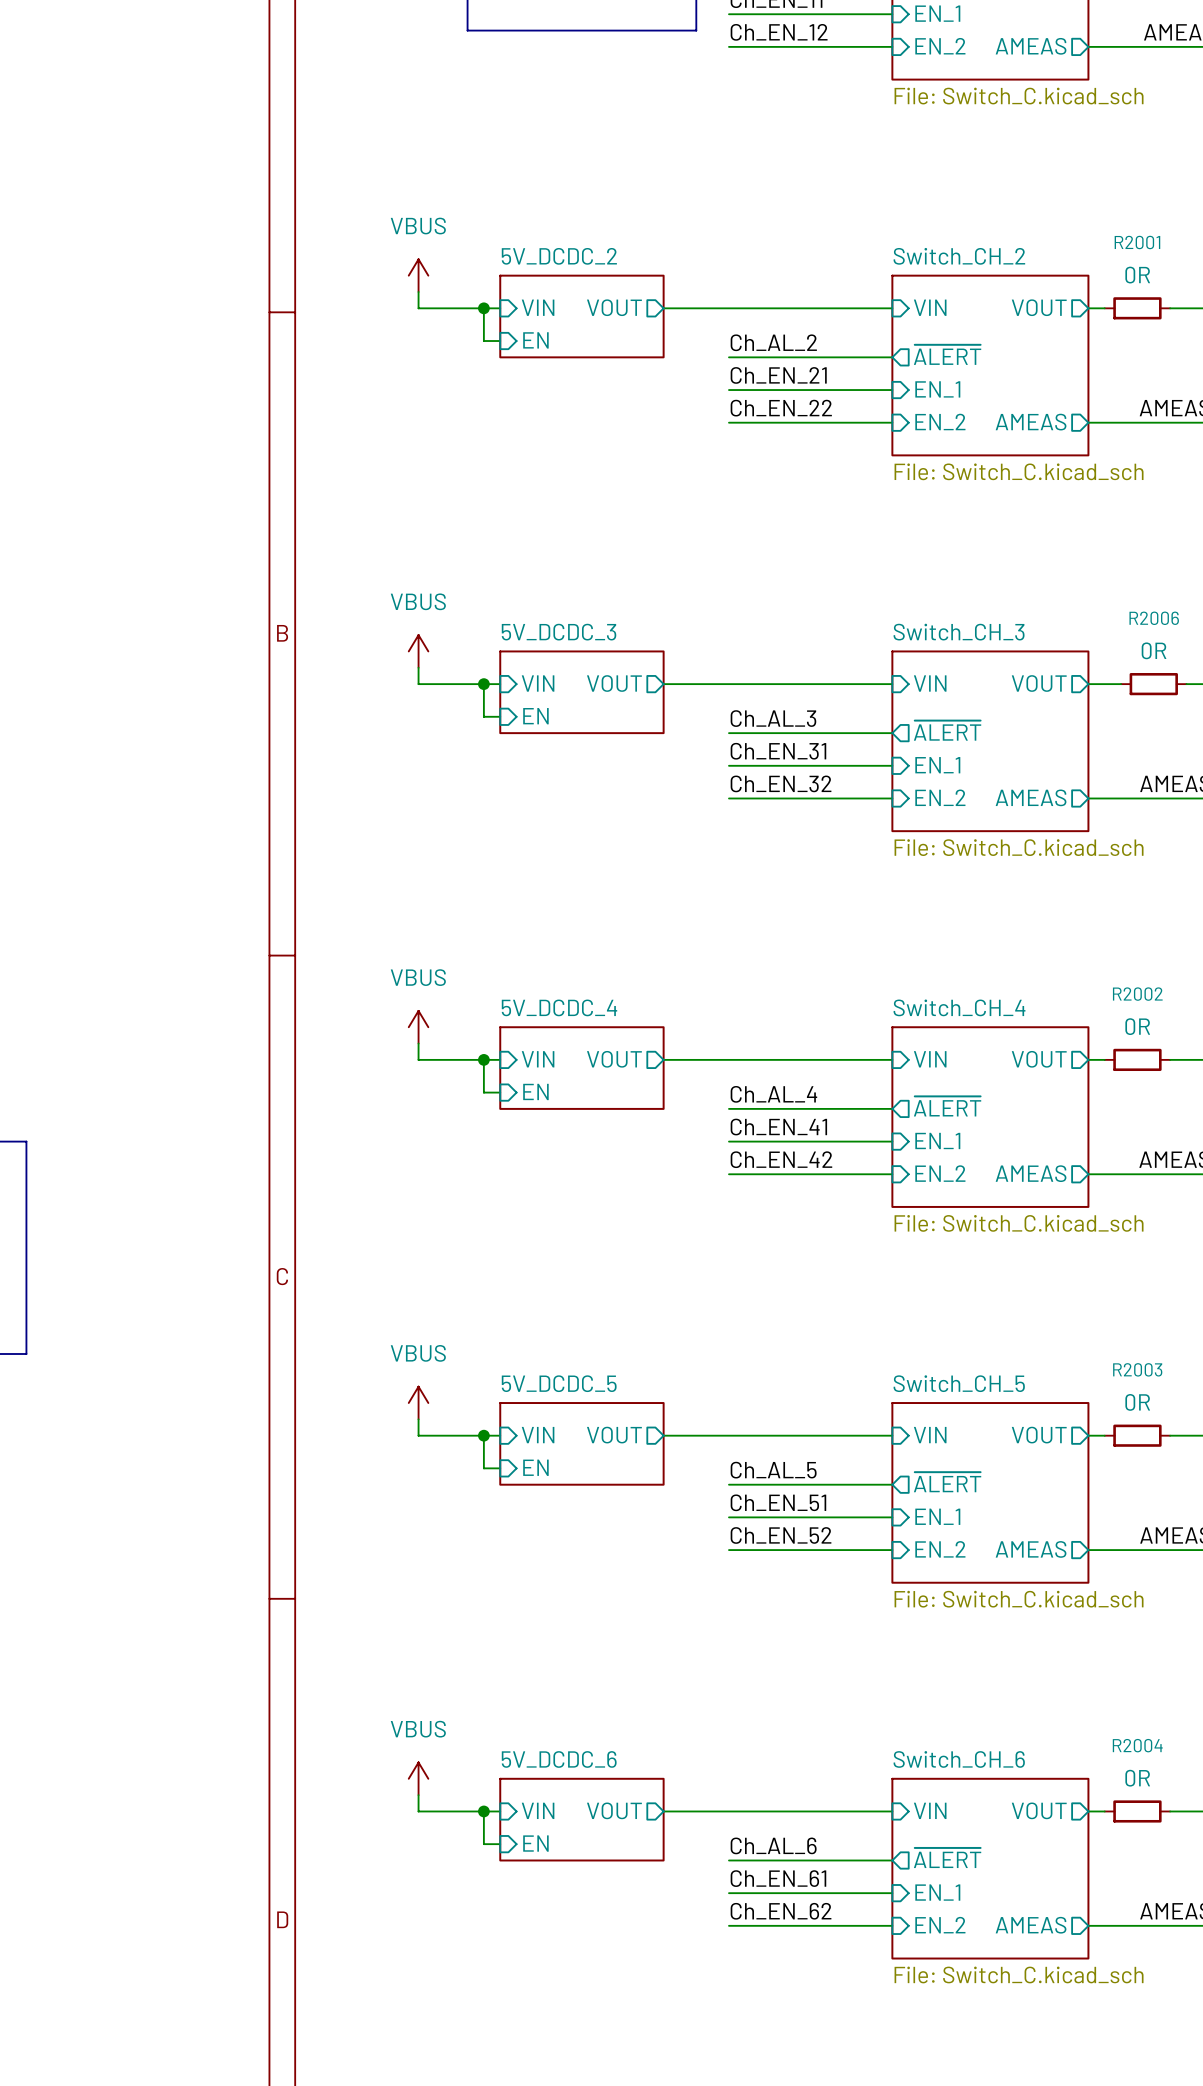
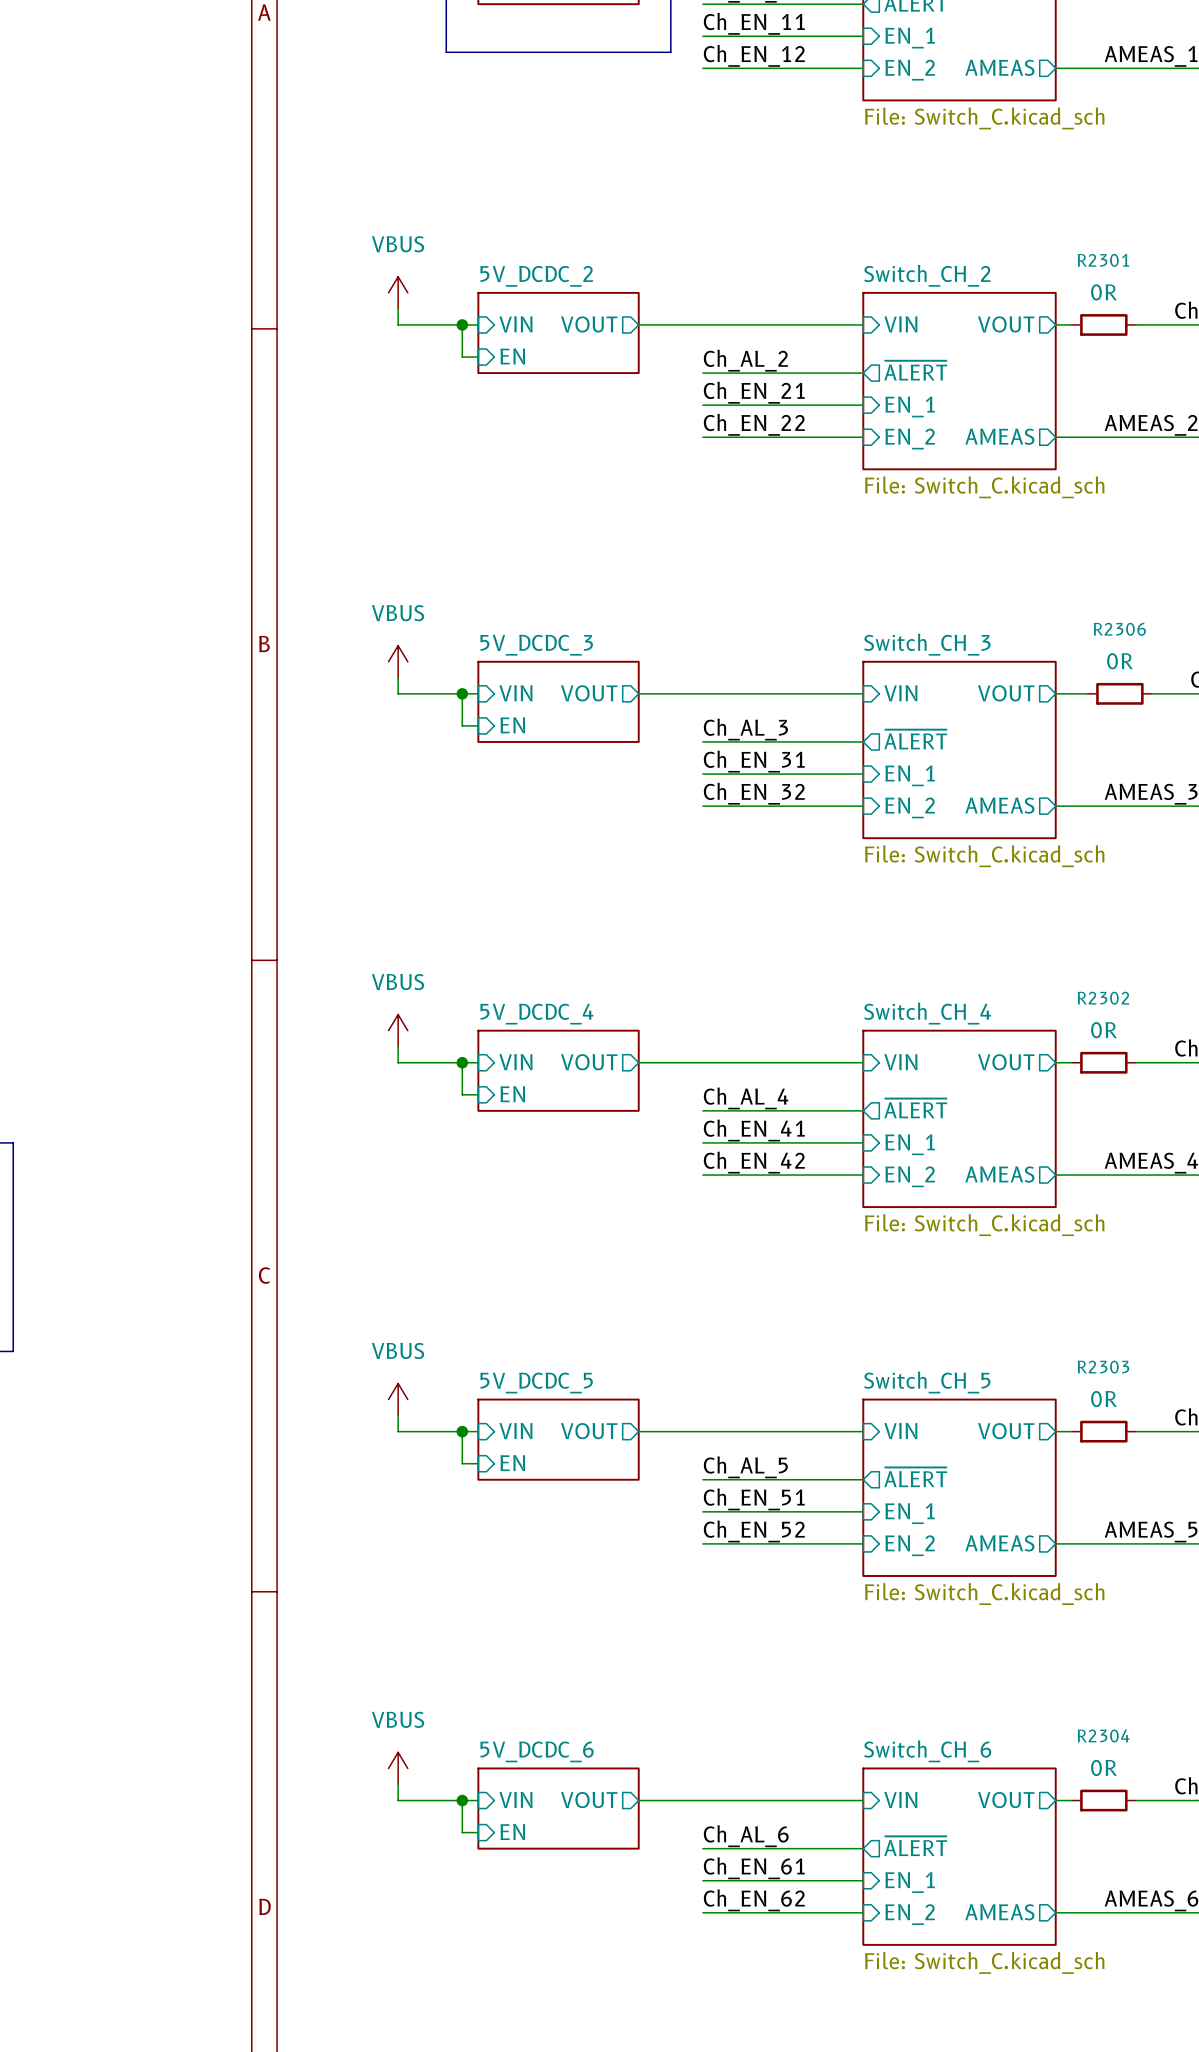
R2001 name: R2001 (1137, 242) -> R2301 (1103, 260)
R2006 name: R2006 (1154, 618) -> R2306 (1119, 629)
R2002 name: R2002 (1137, 994) -> R2302 (1103, 998)
R2003 name: R2003 (1137, 1369) -> R2303 (1103, 1367)
R2004 name: R2004 (1137, 1745) -> R2304 (1103, 1735)

